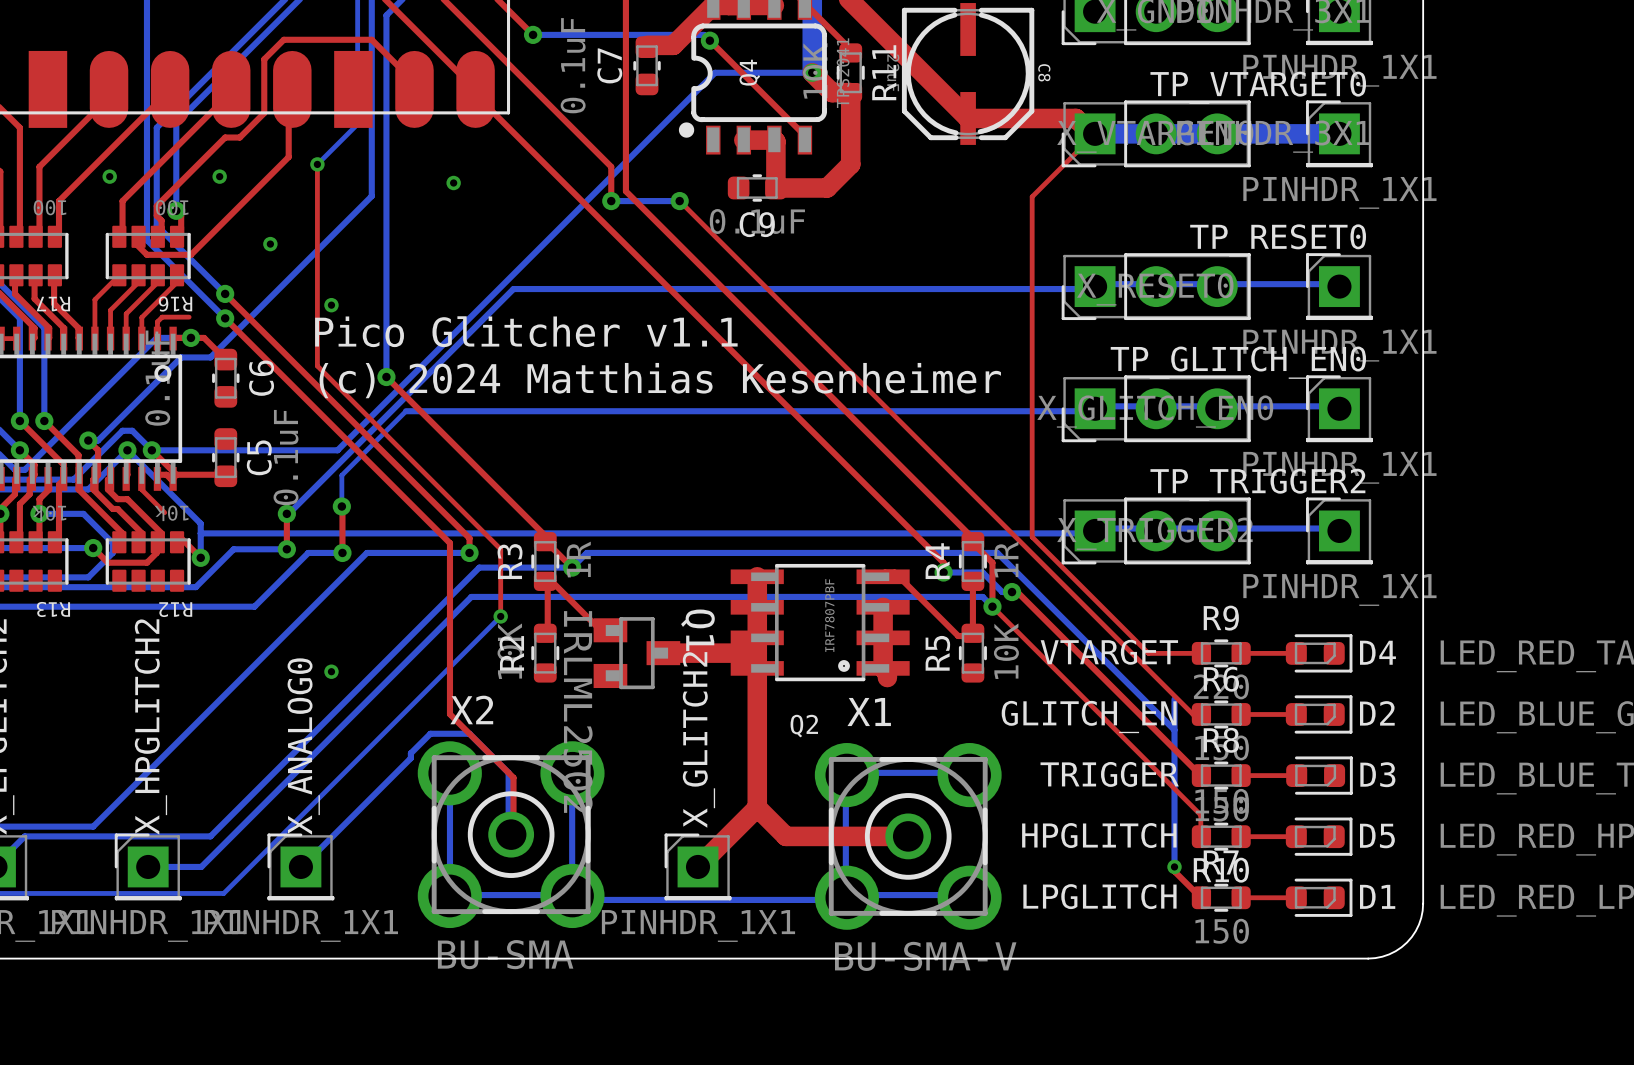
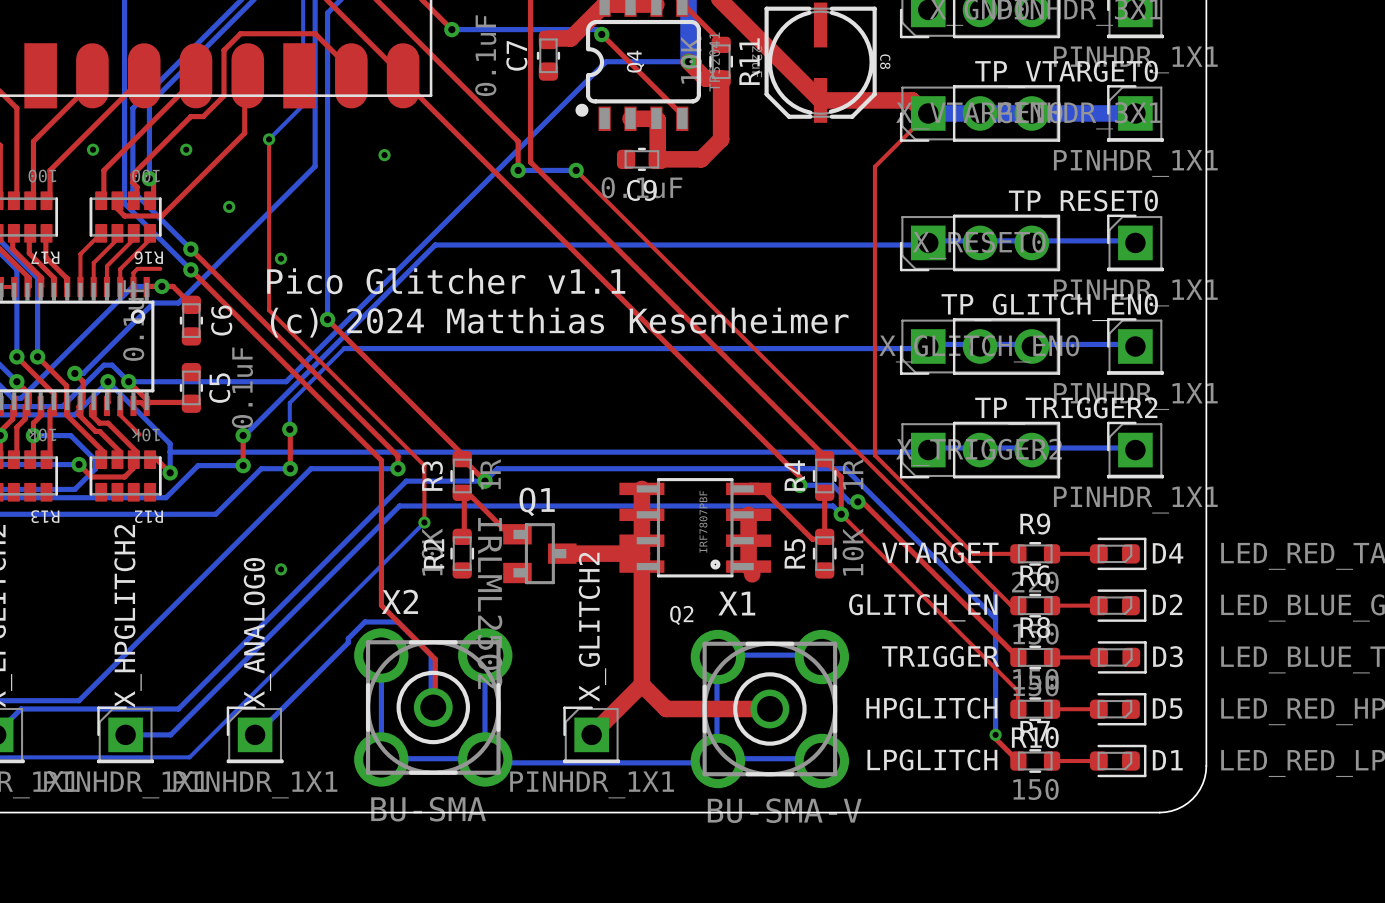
Q1 name rotation: 0° (697, 630) -> 90° counterclockwise (537, 501)
Q1 name position: Q1 (697, 630) -> Q1 (537, 501)

